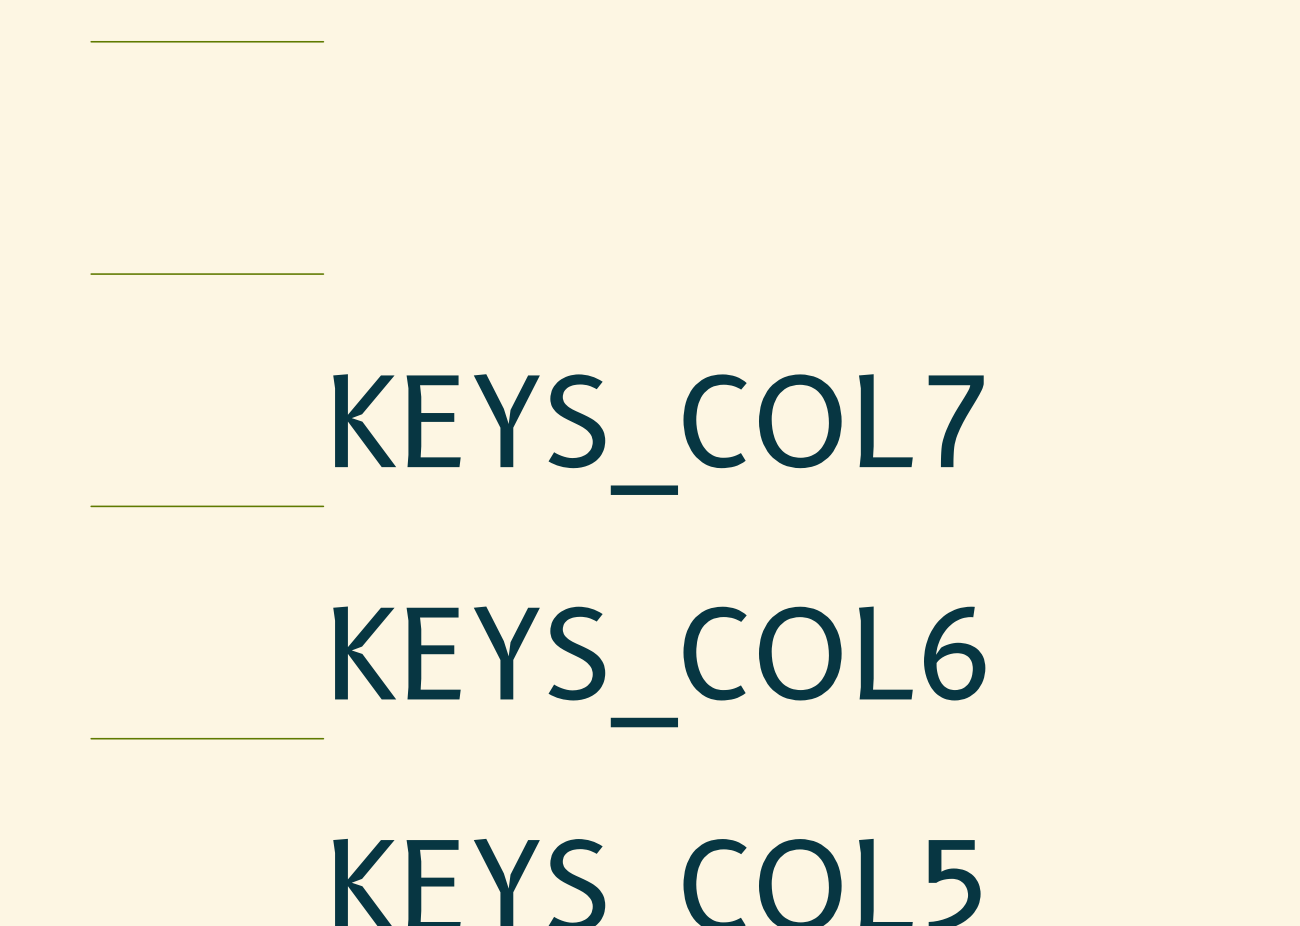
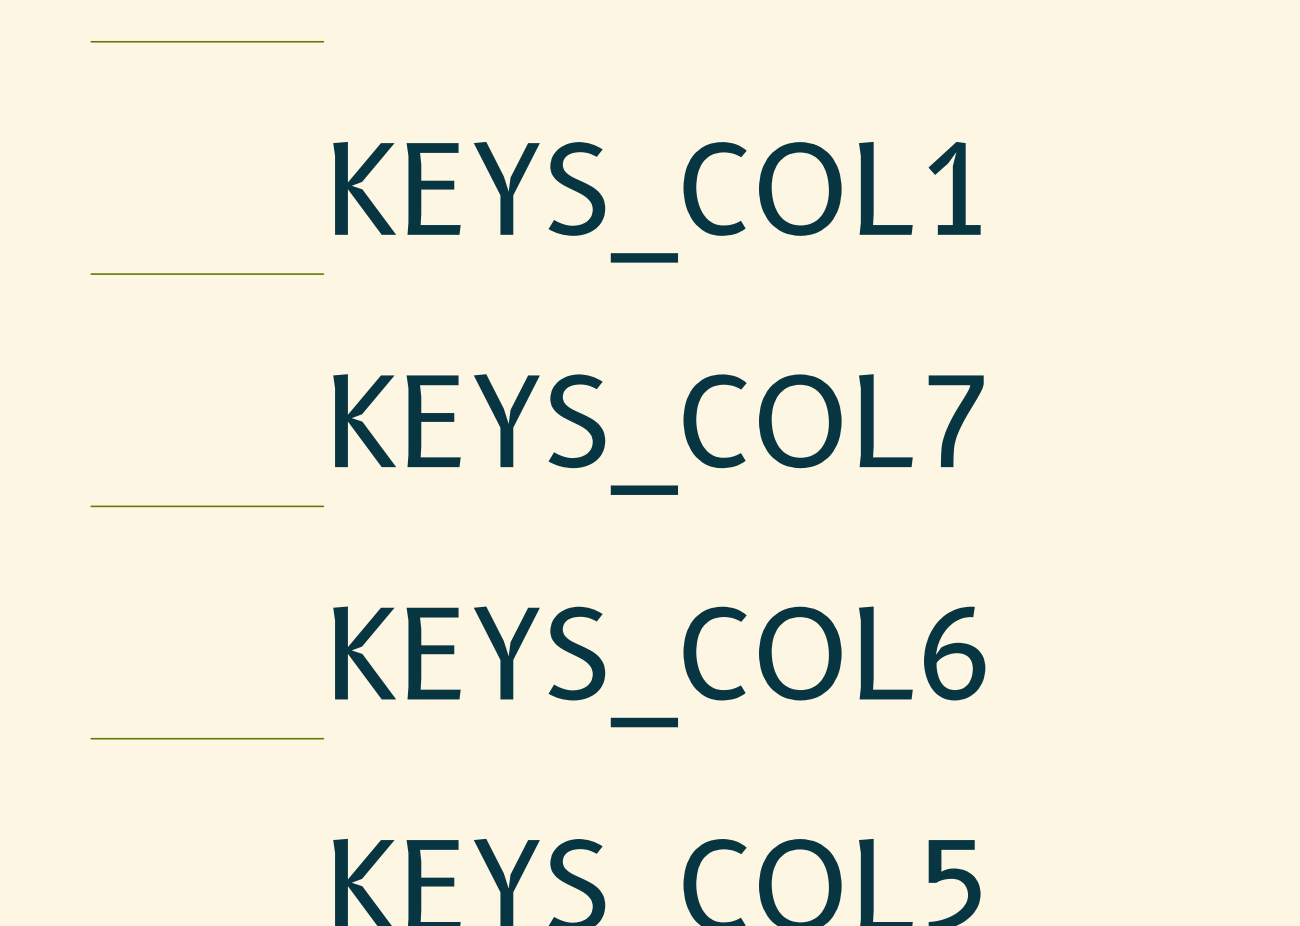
label: none -> KEYS_COL1 (656, 202)

